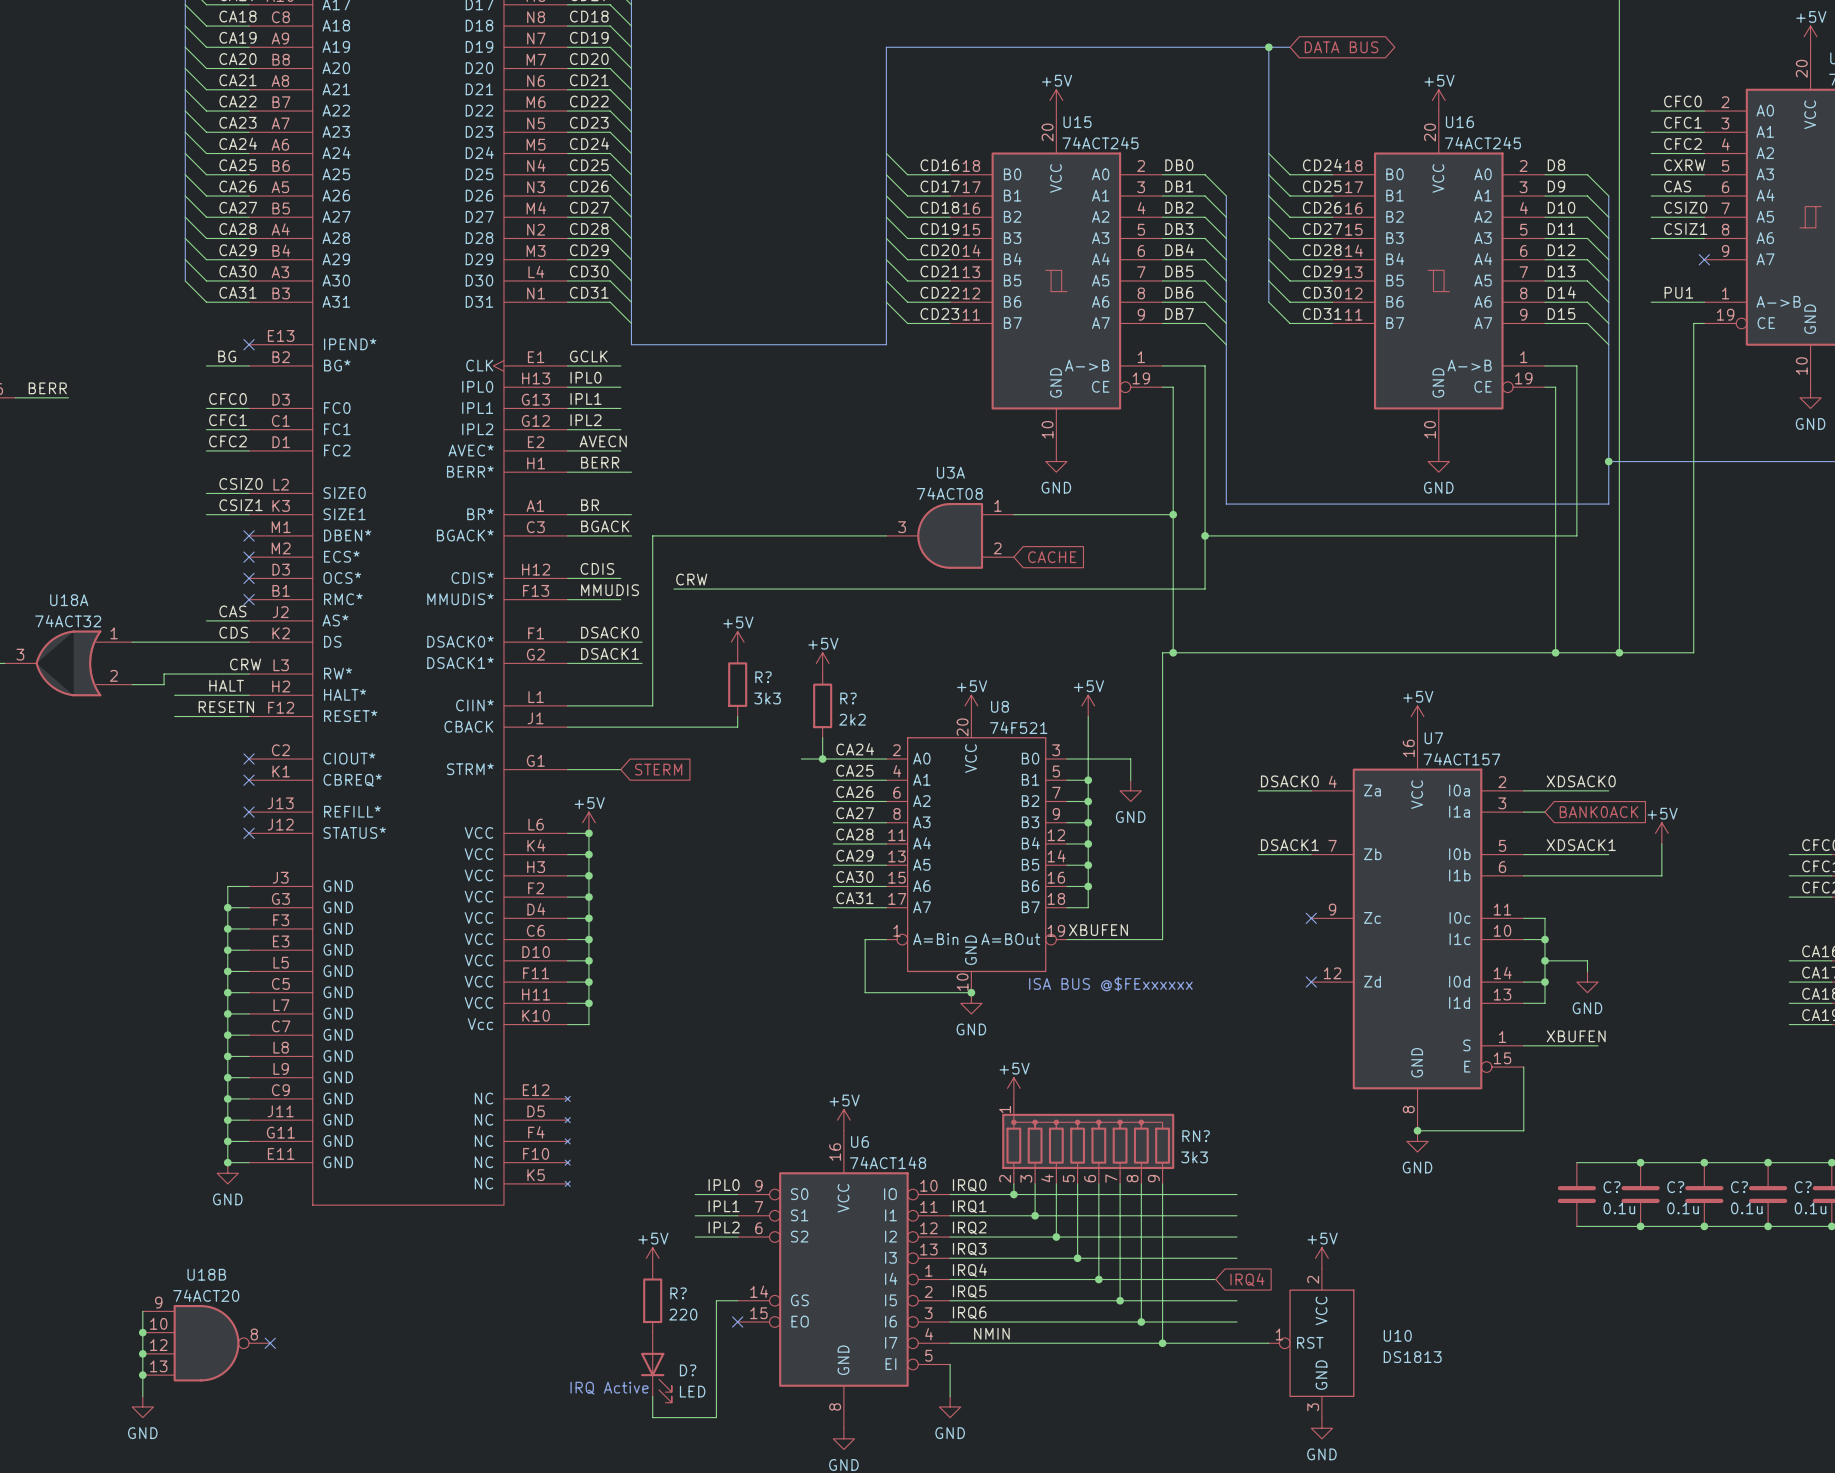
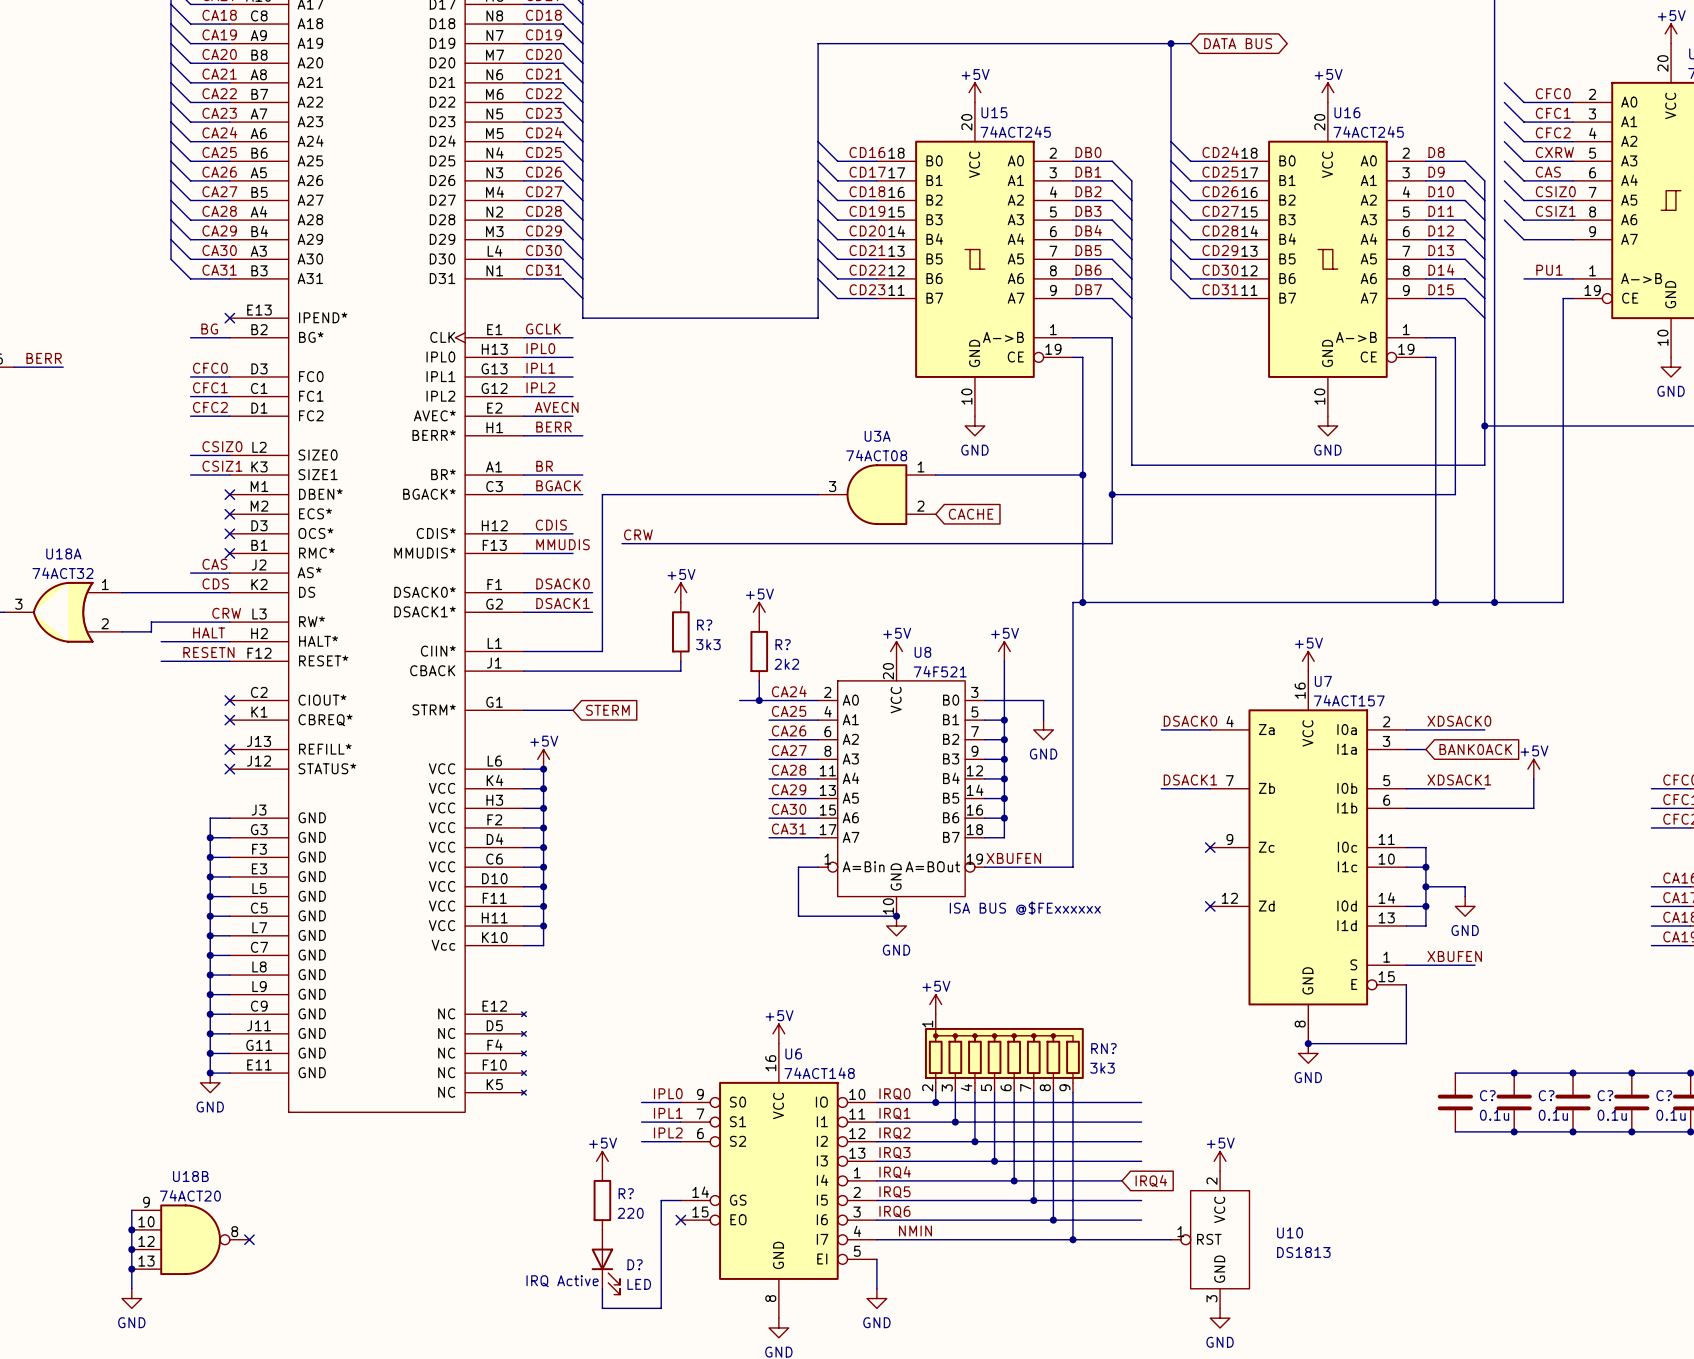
wire: none -> (1504, 82) (1523, 102)
wire: none -> (1504, 102) (1523, 122)
wire: none -> (1504, 122) (1523, 141)
wire: none -> (1504, 141) (1523, 161)
wire: none -> (1504, 161) (1523, 180)
wire: none -> (1504, 180) (1523, 200)
wire: none -> (1504, 200) (1523, 220)
wire: none -> (1504, 220) (1523, 239) (1573, 239)
no-connect mark: (1704, 259) -> none

